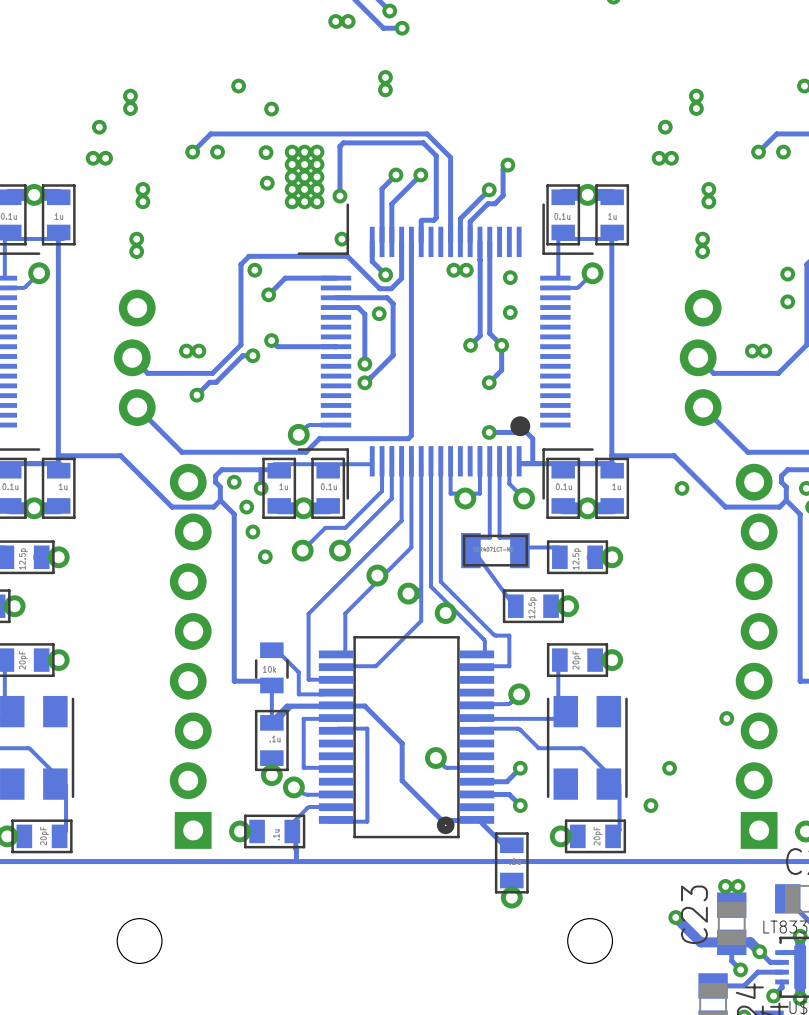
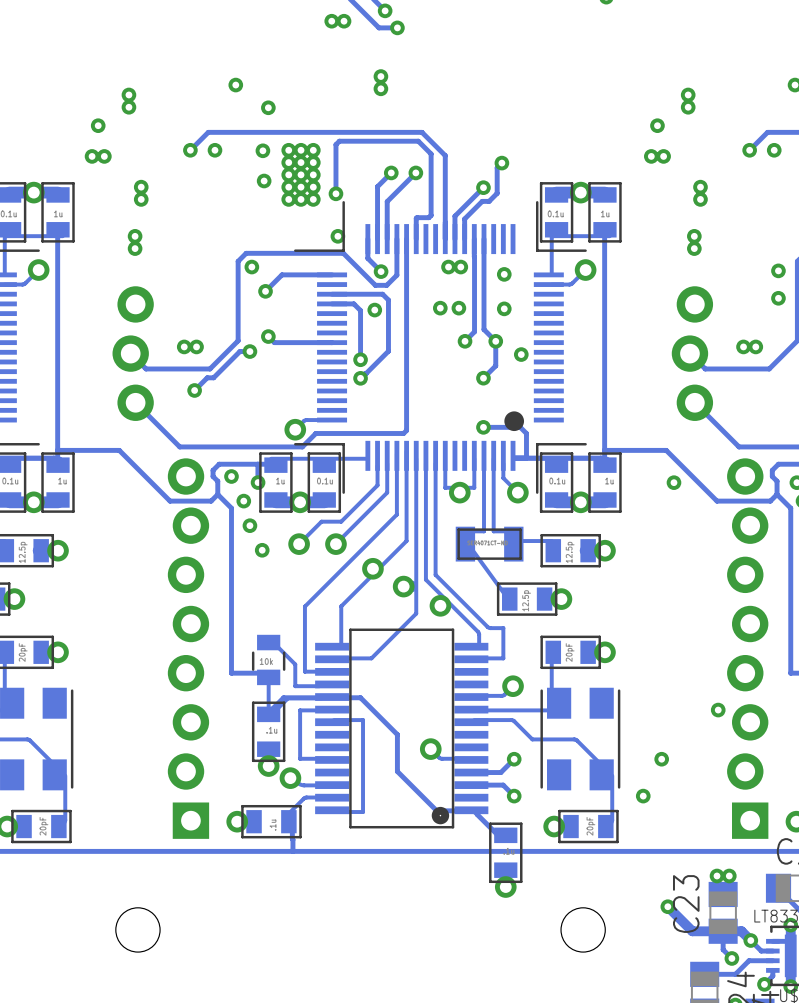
via: none -> (440, 308)
via: none -> (458, 308)
via: none -> (521, 354)

